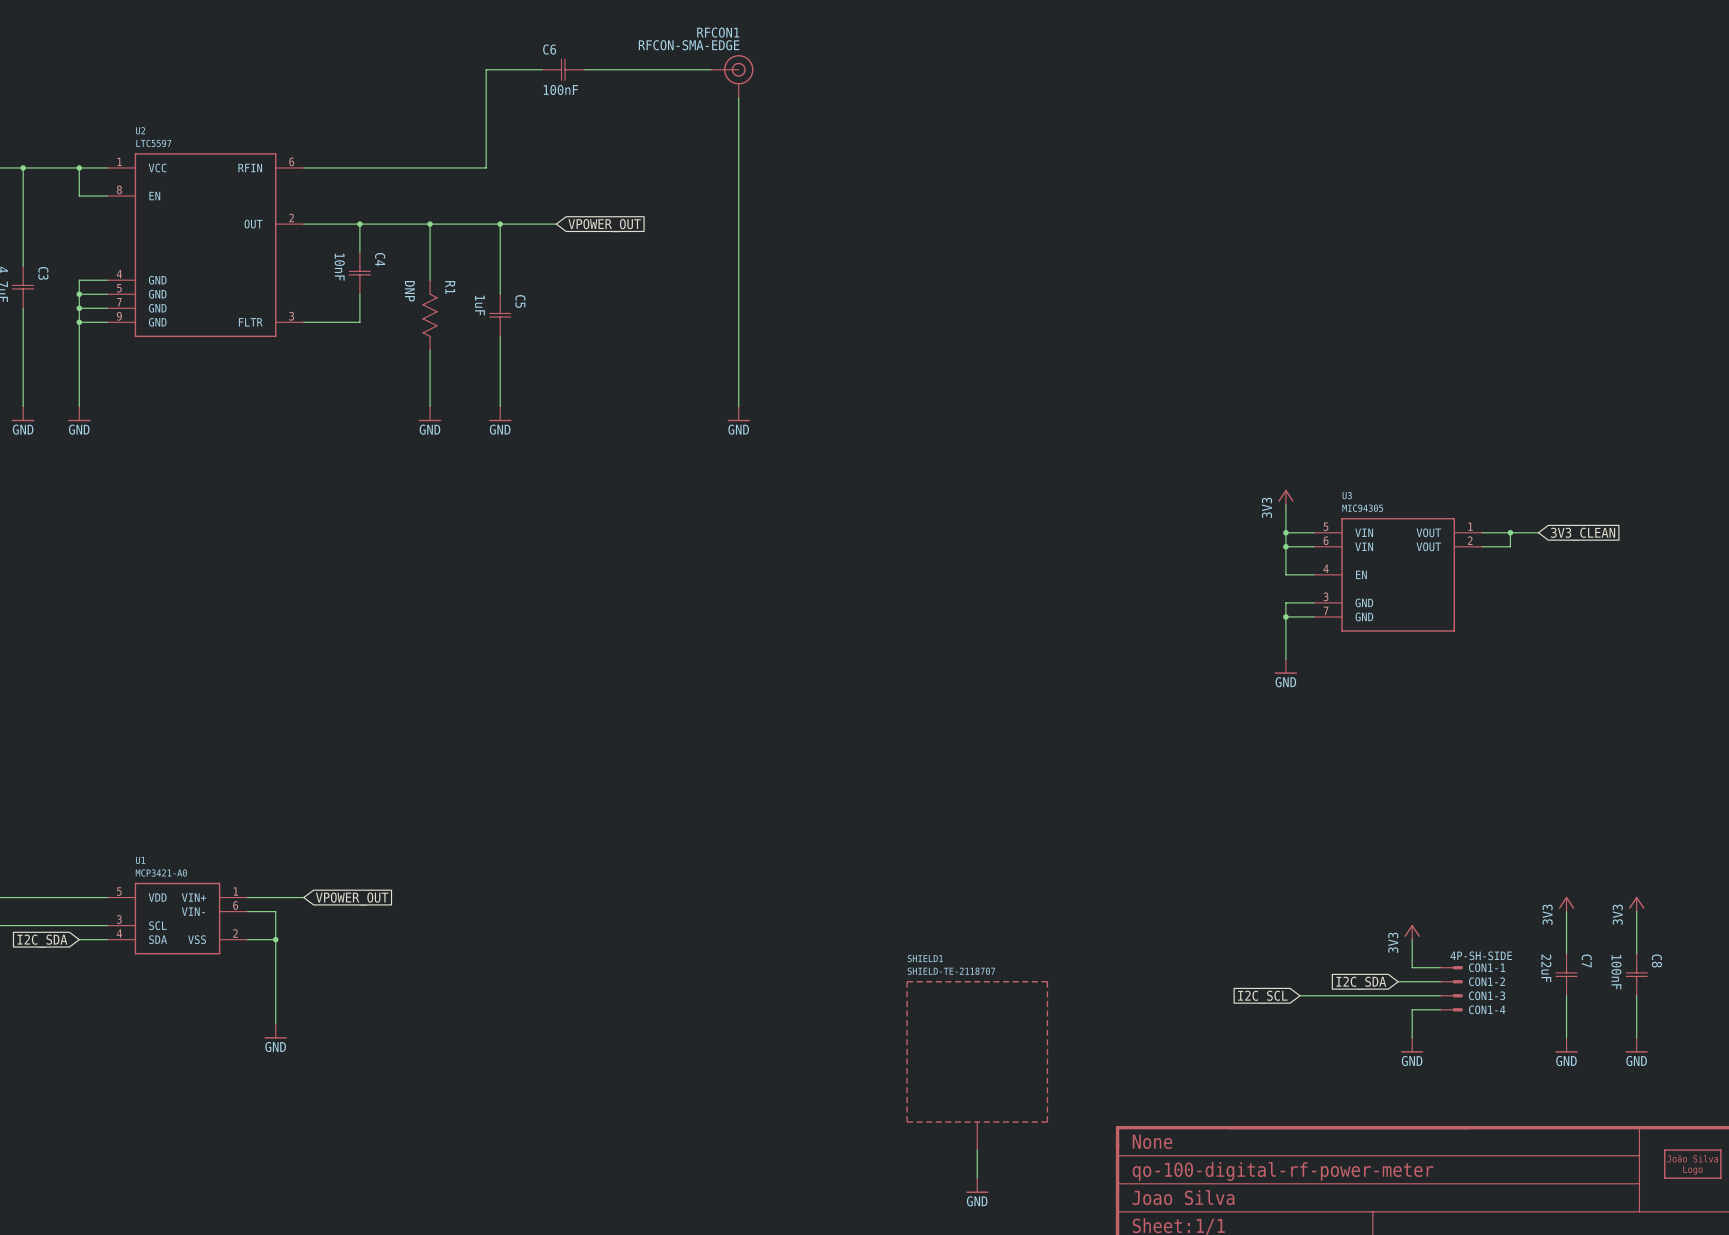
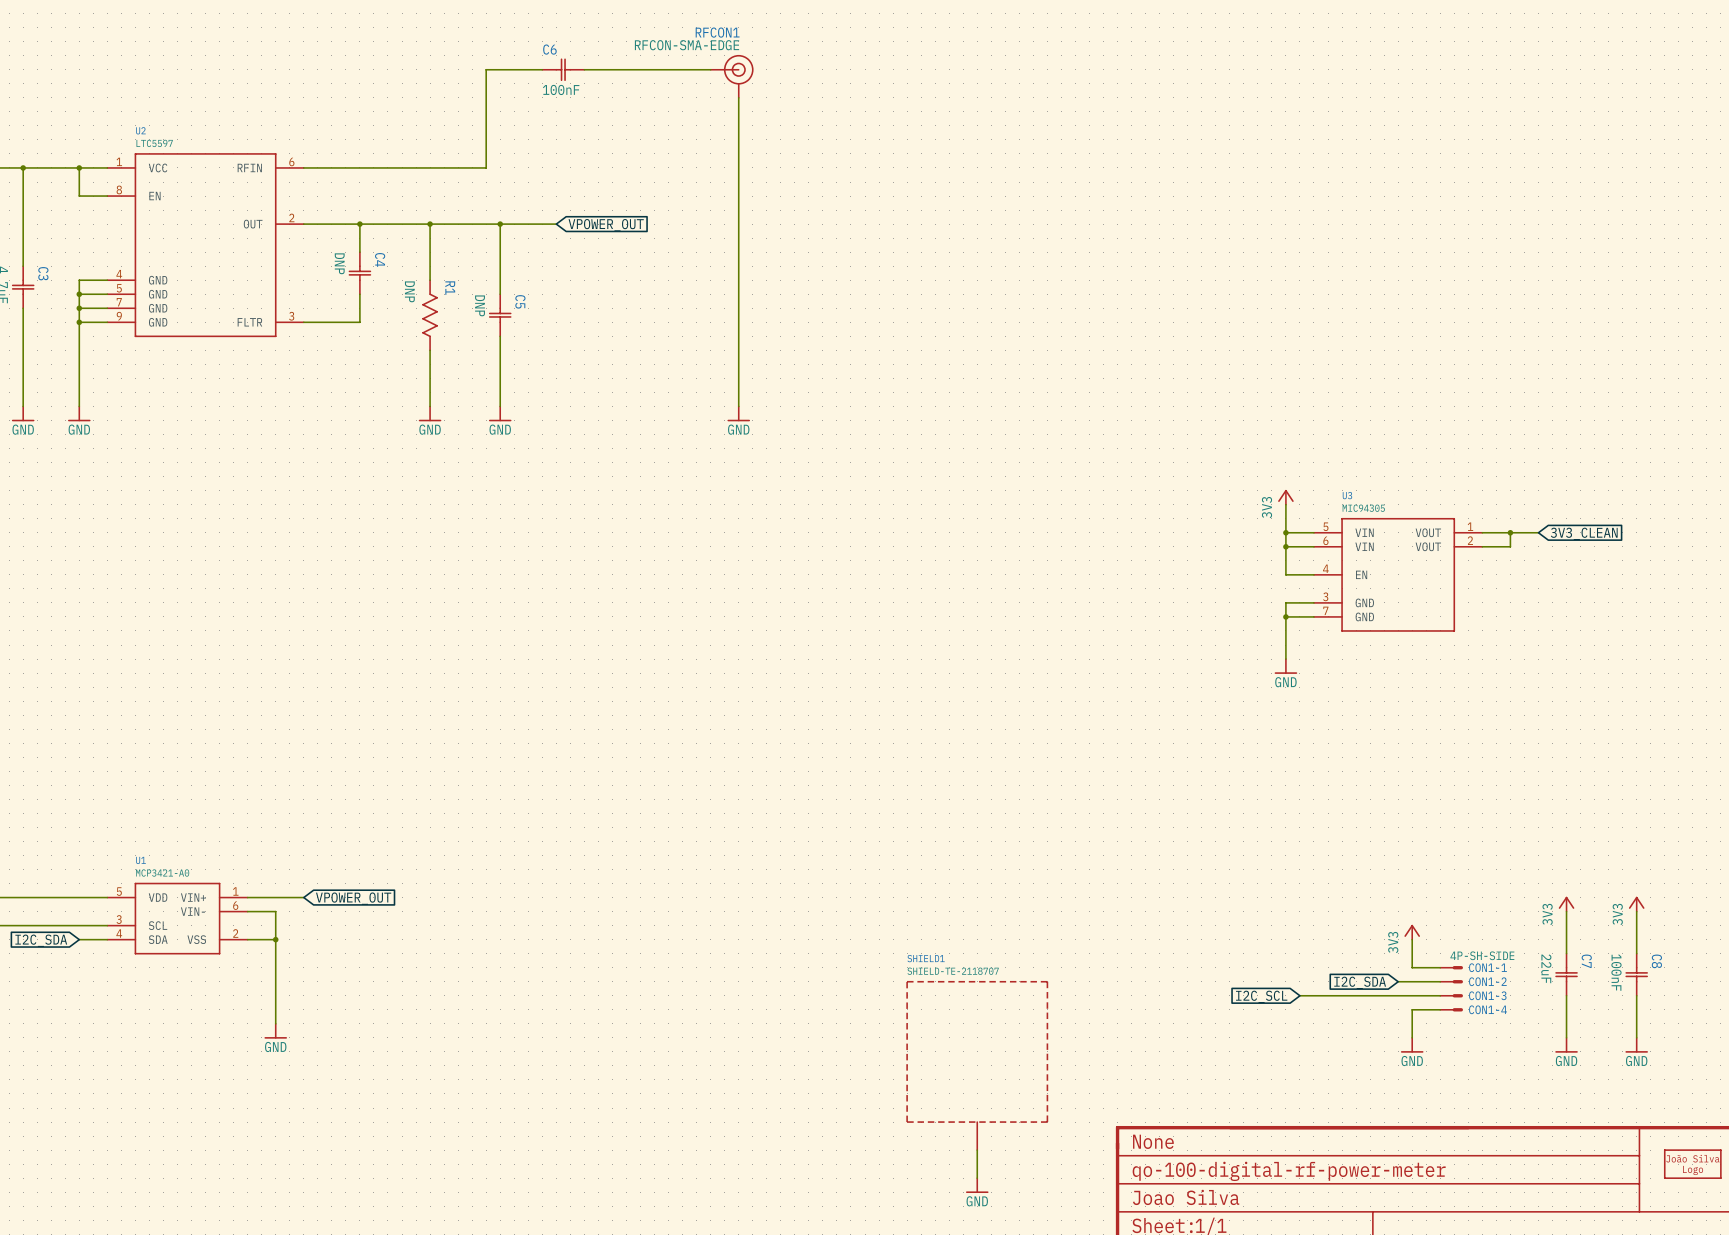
C4 value: 10nF (339, 267) -> DNP (339, 263)
C5 value: 1uF (479, 305) -> DNP (480, 305)

